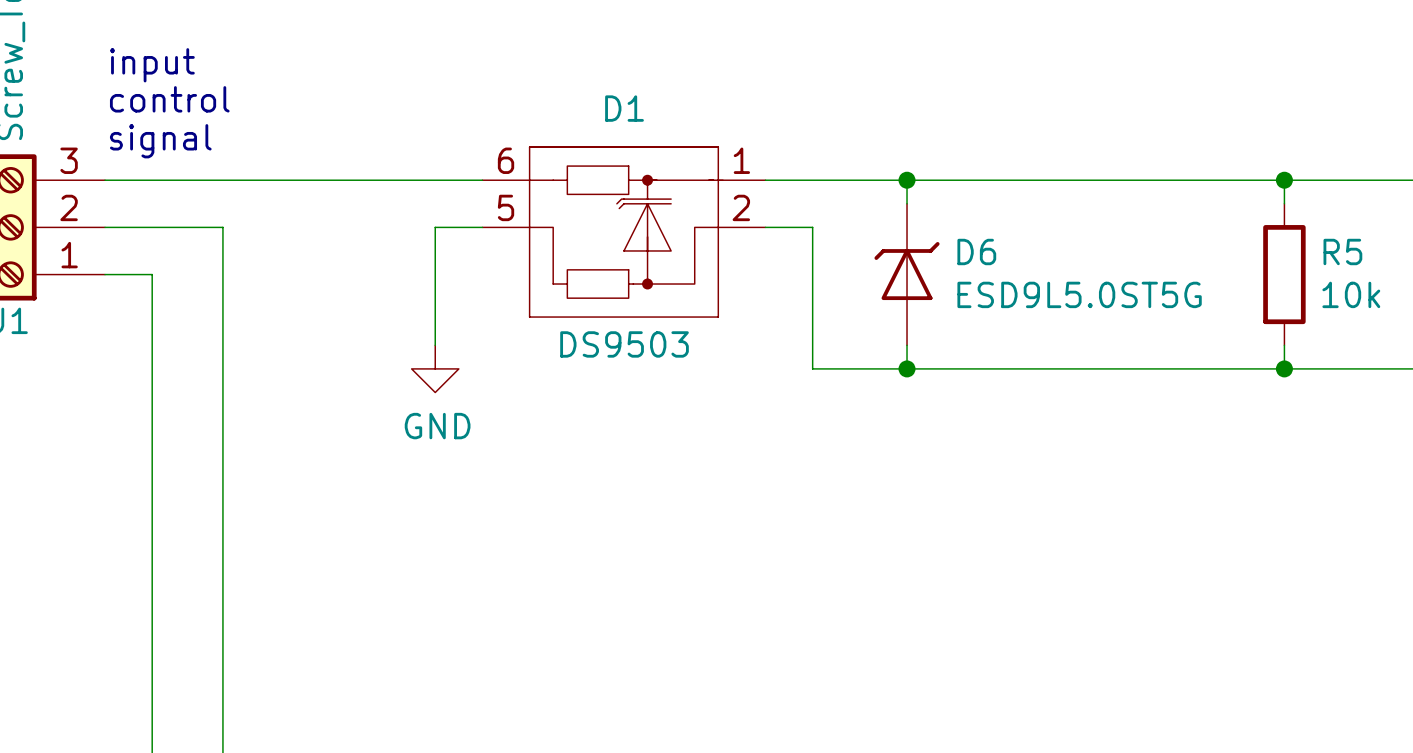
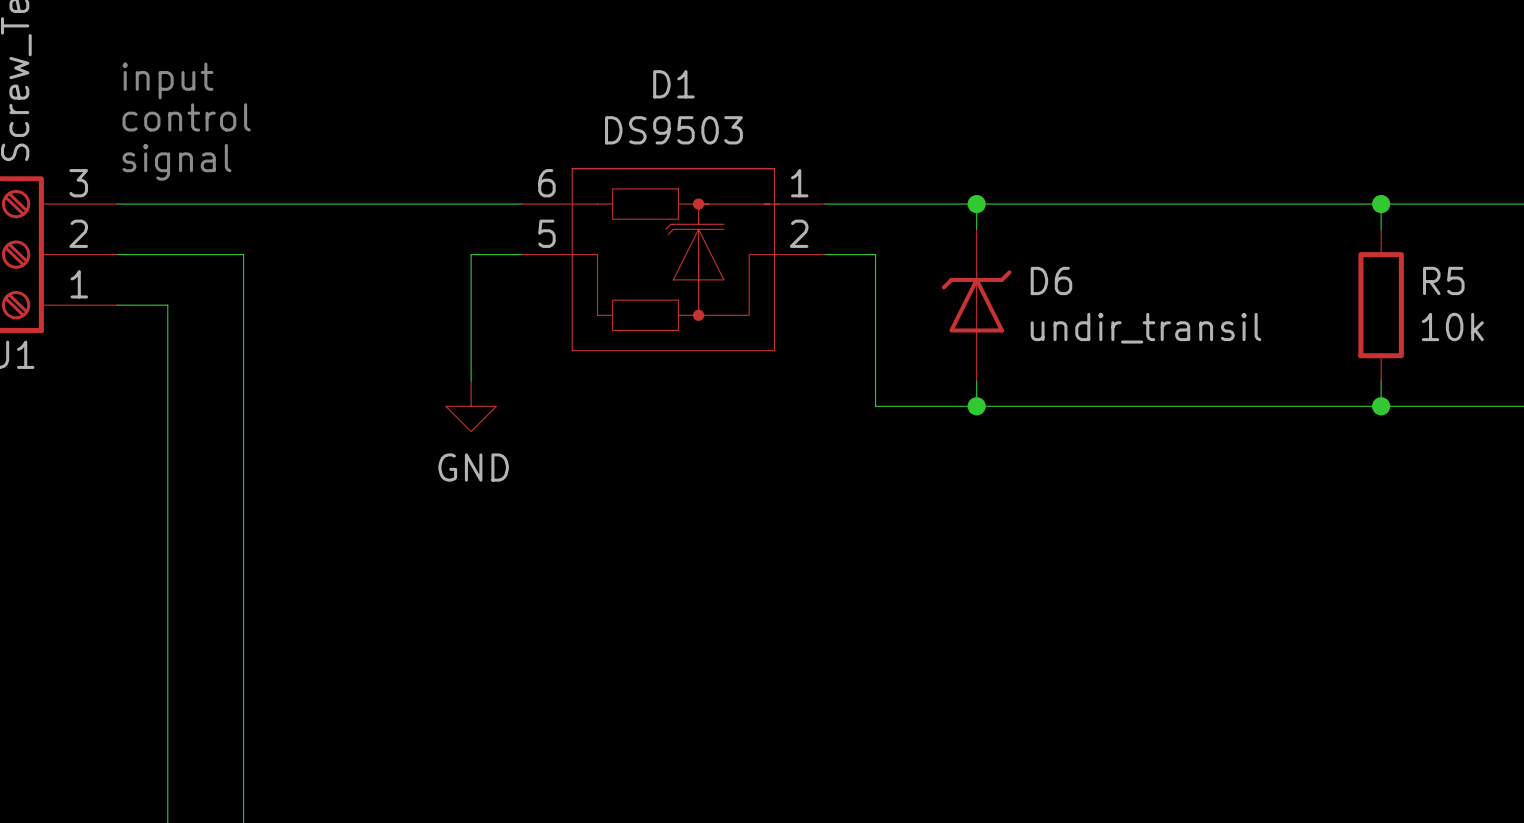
D1 name position: D1 (624, 108) -> D1 (673, 84)
D6 value: ESD9L5.0ST5G (1079, 294) -> undir_transil (1145, 328)
D1 value position: DS9503 (624, 344) -> DS9503 (673, 130)

